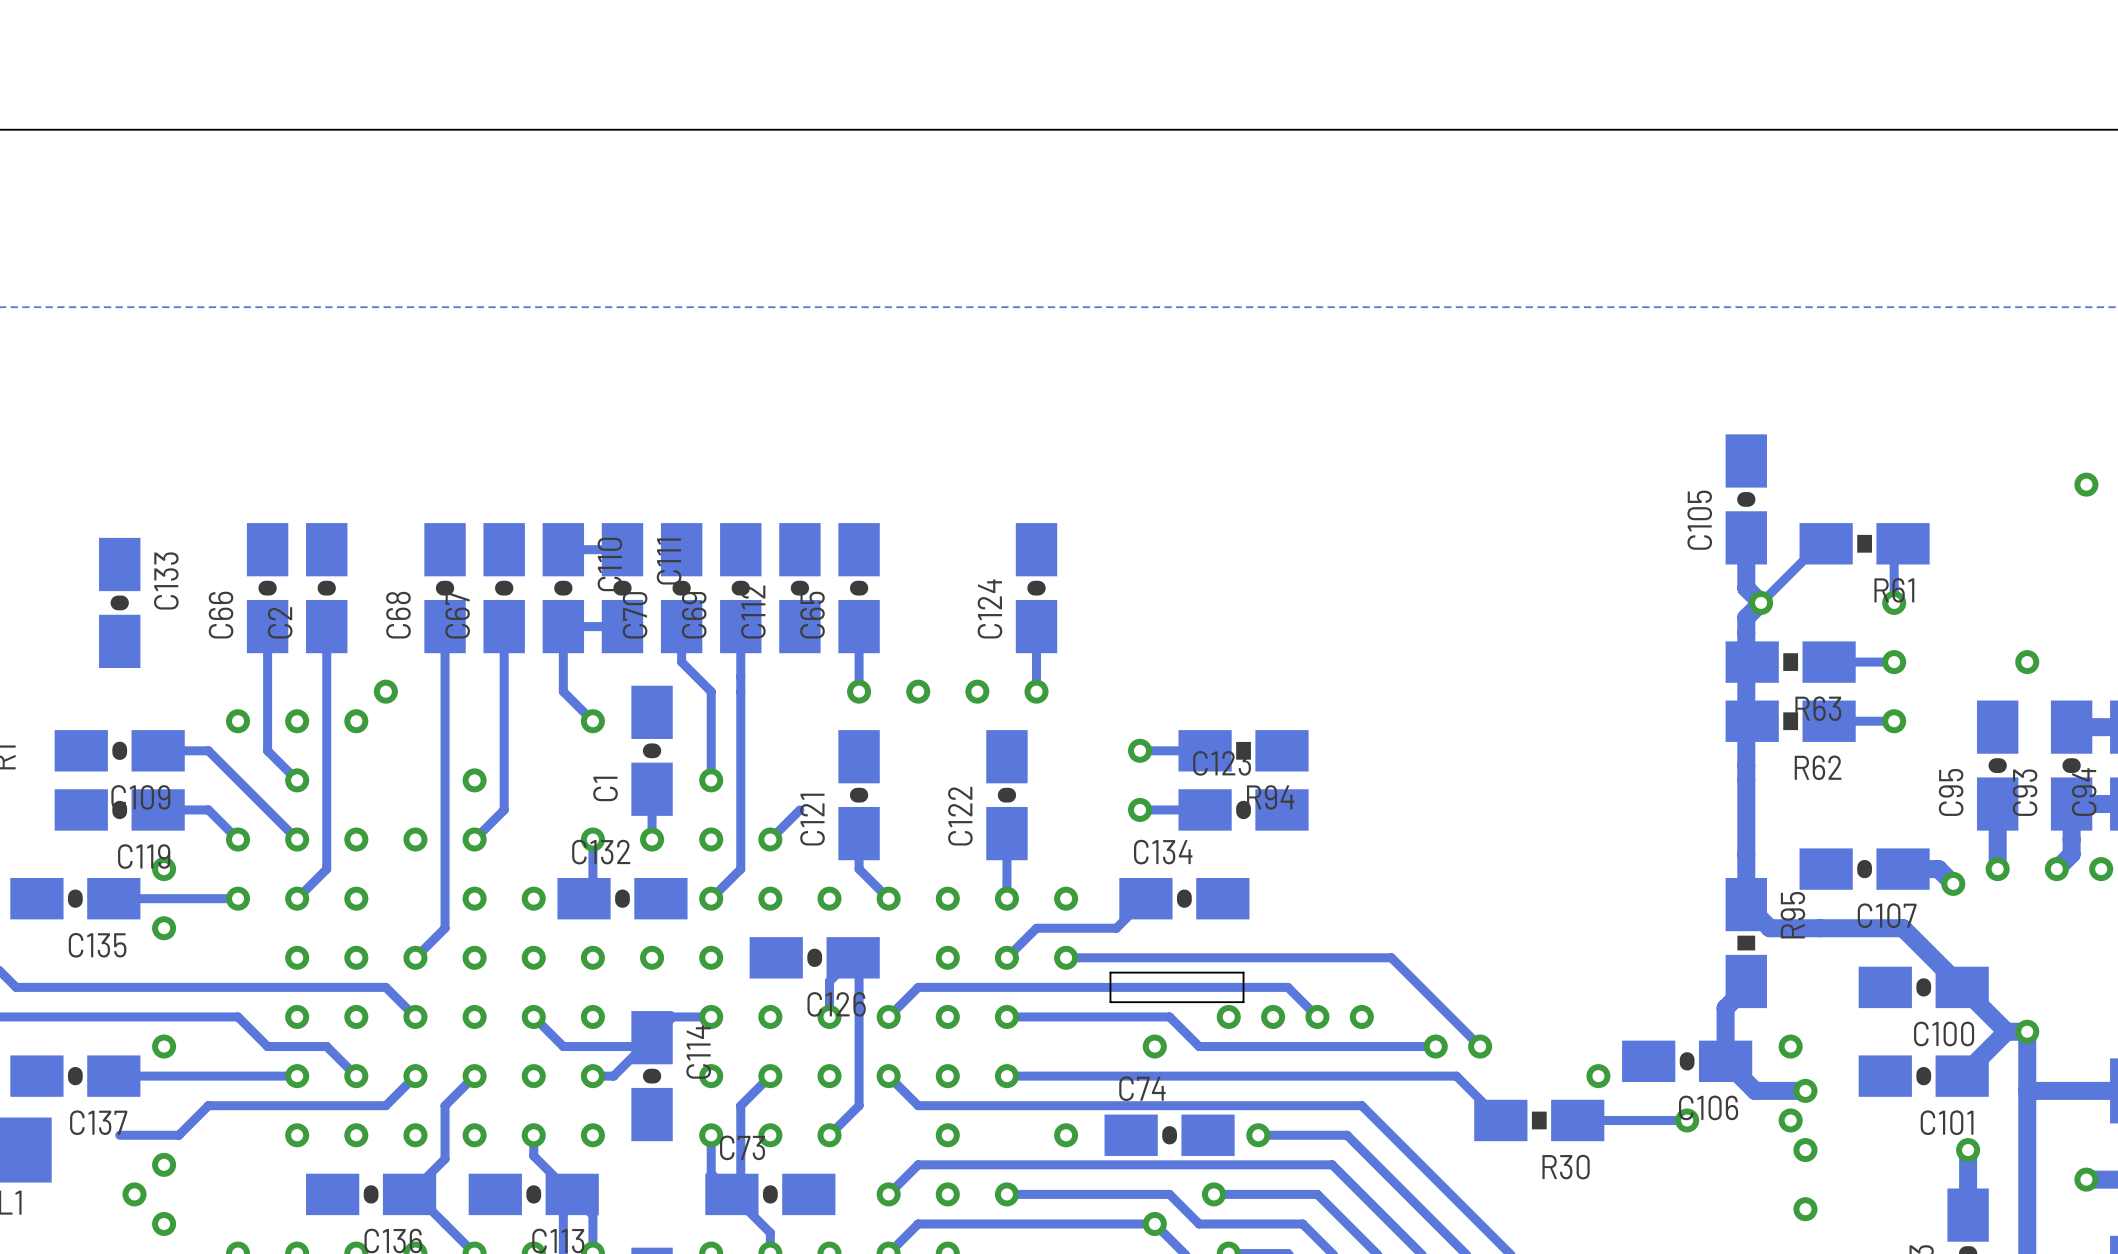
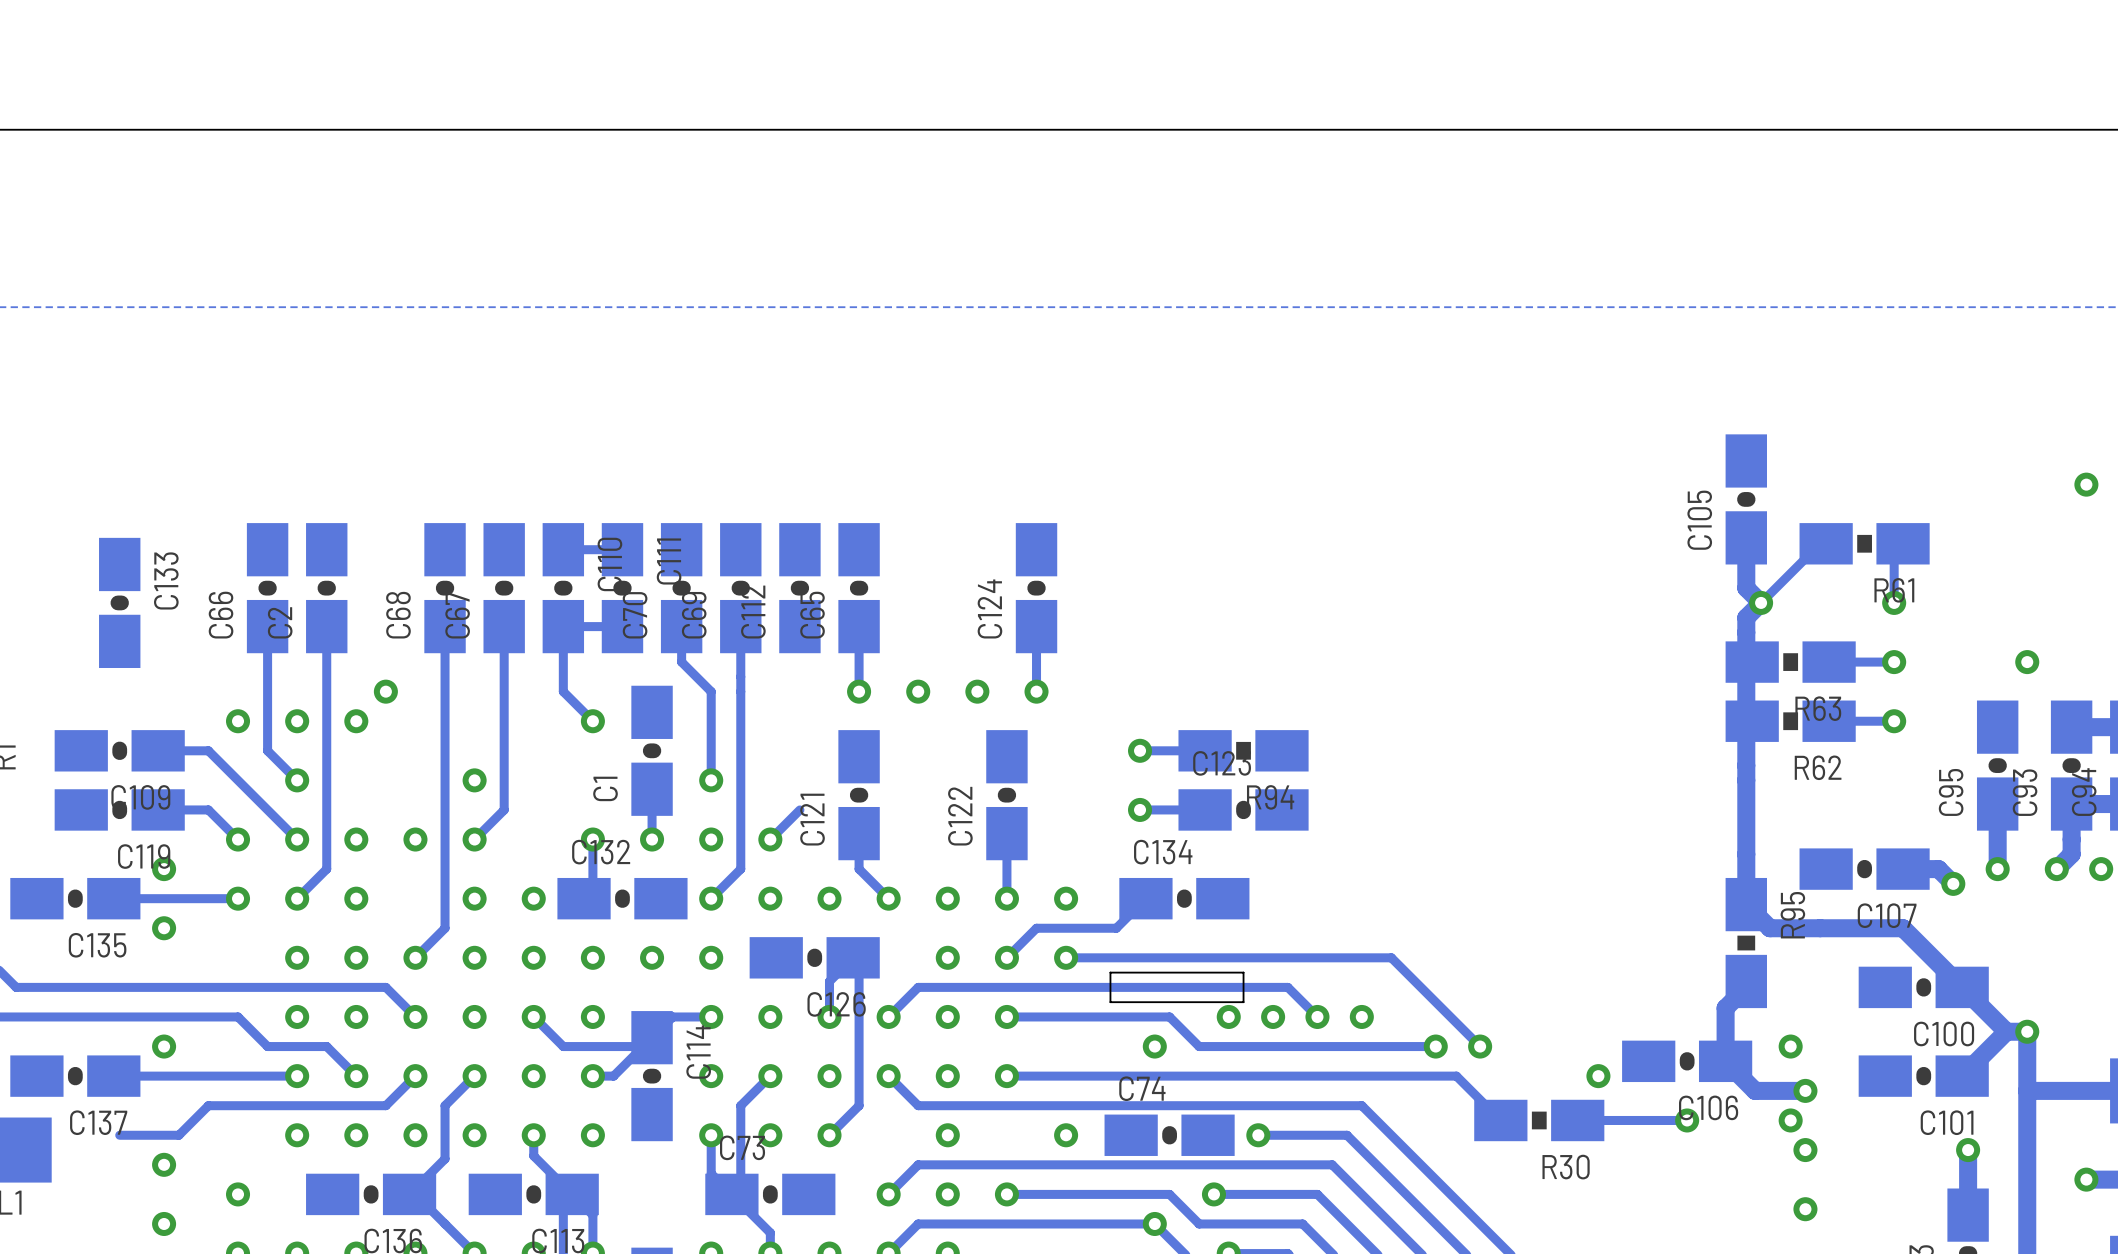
via: (134, 1194) -> none
via: none -> (238, 1194)

